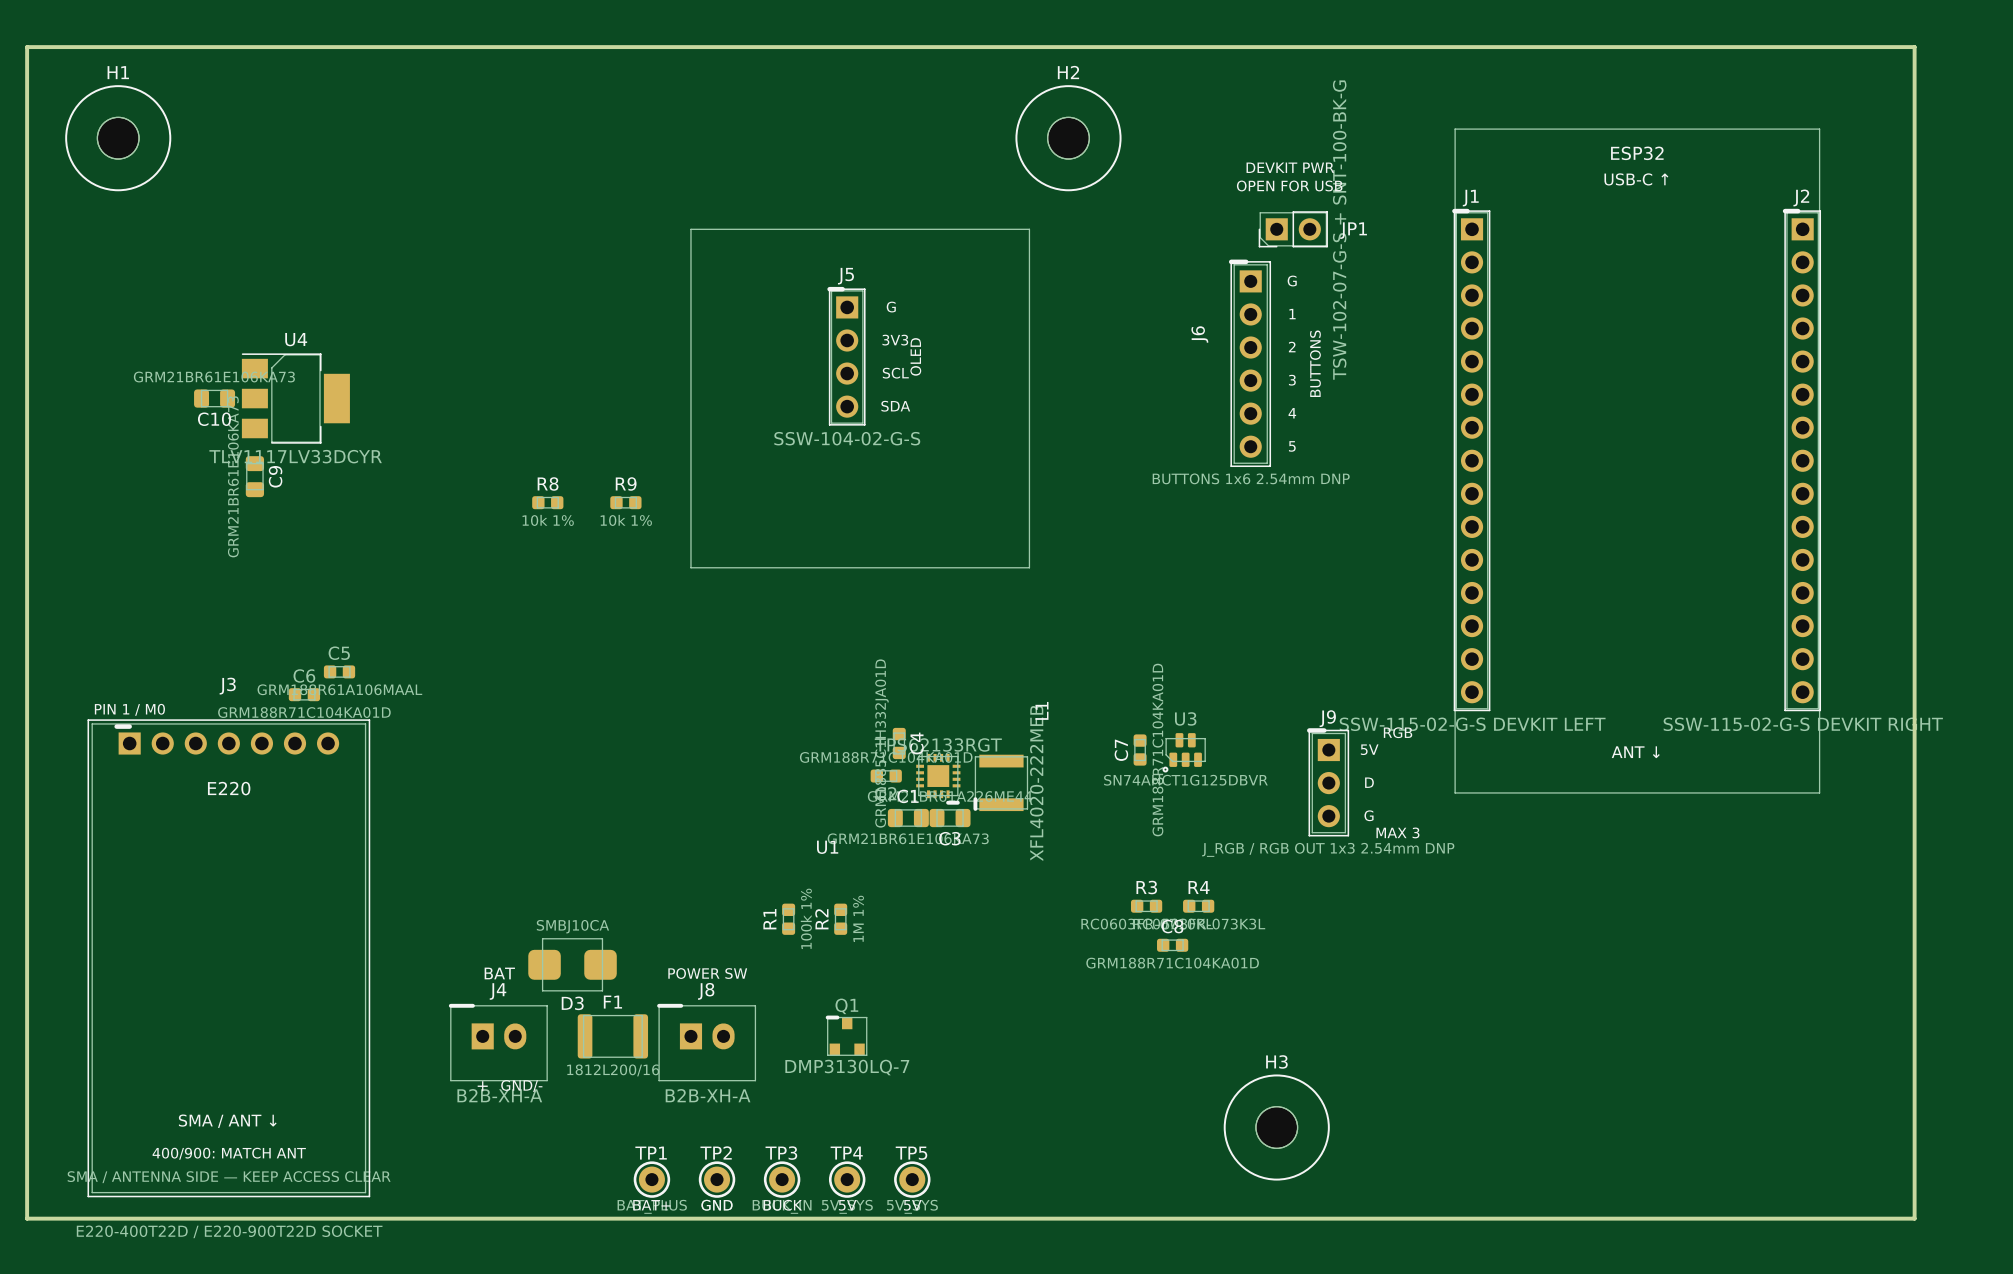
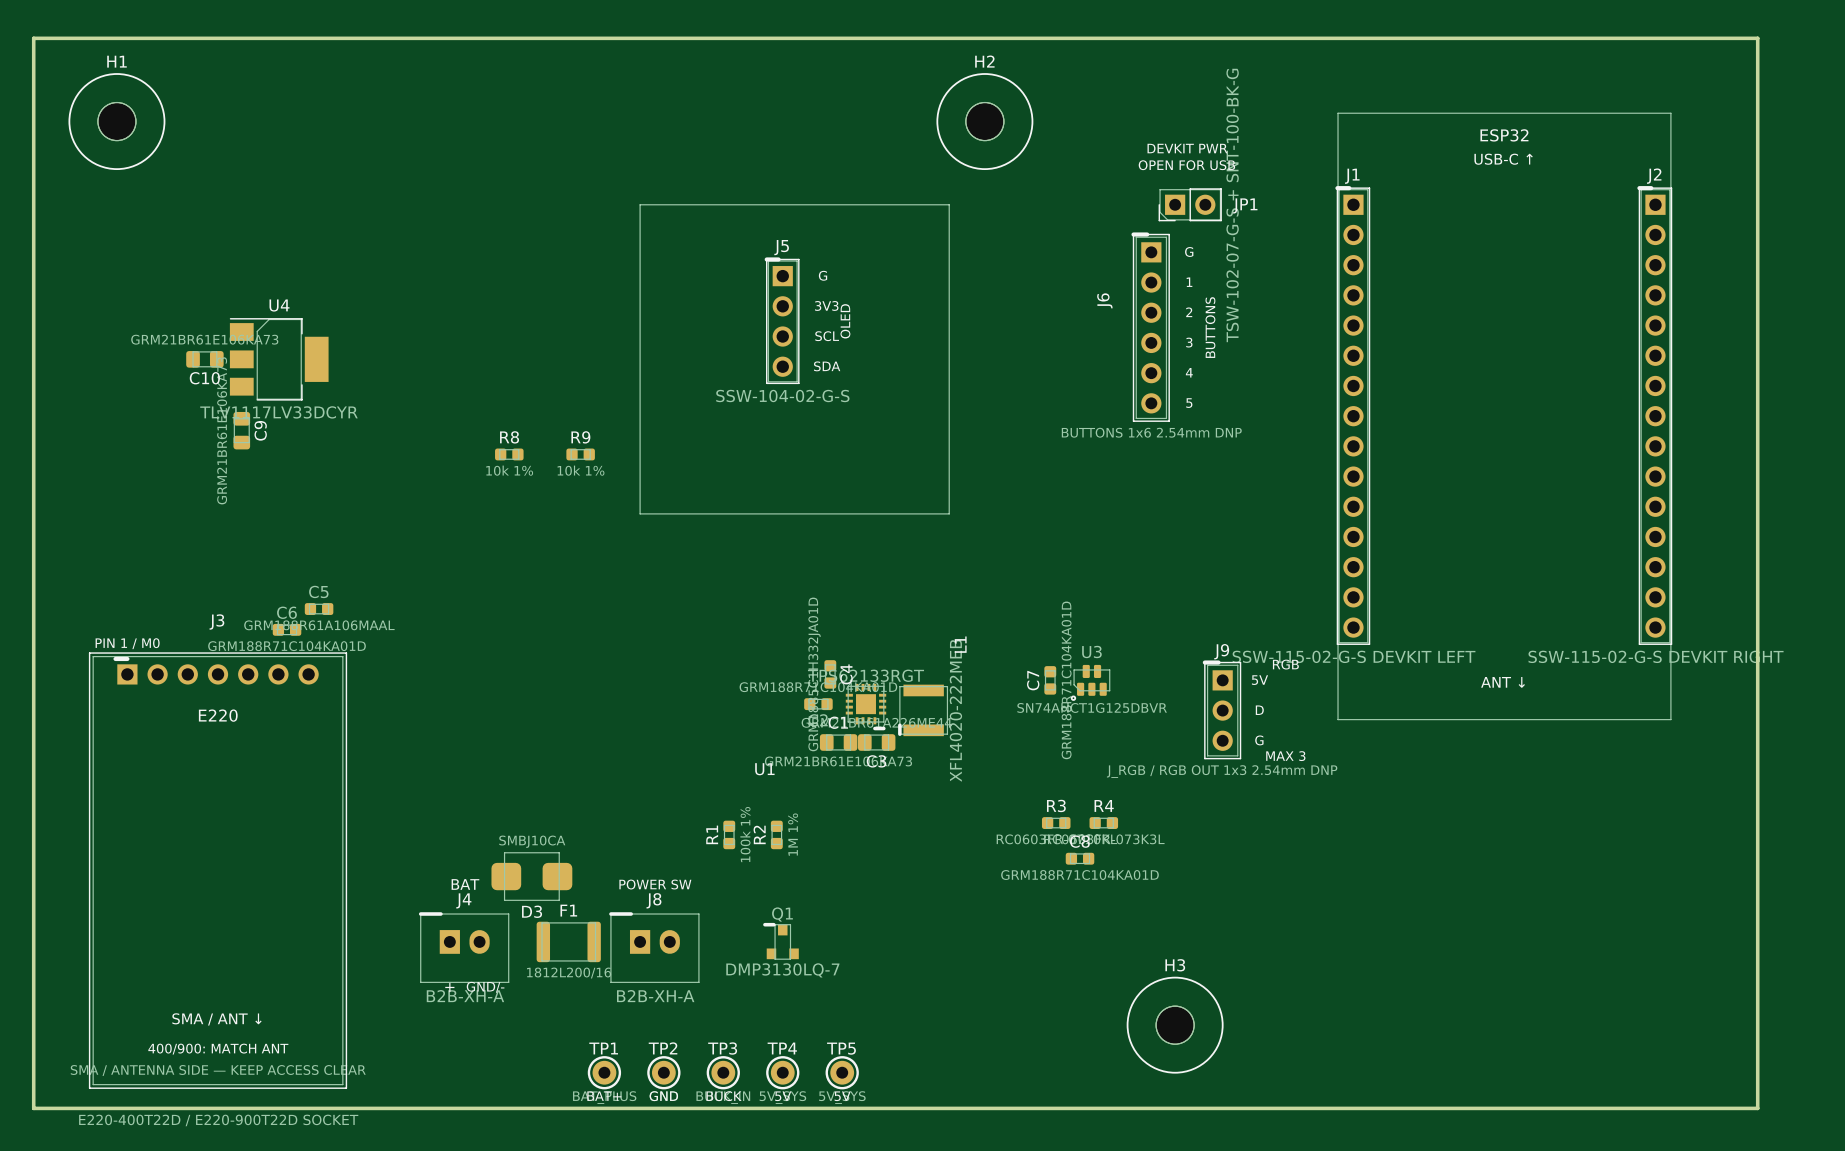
Q1 footprint: [825, 1015, 868, 1056] -> [763, 922, 799, 960]

